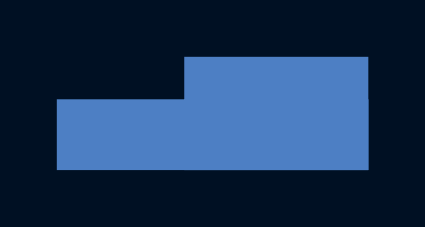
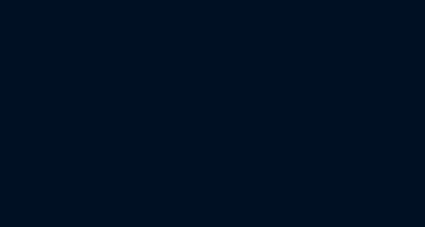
drawing: [56, 56, 369, 171] -> none

